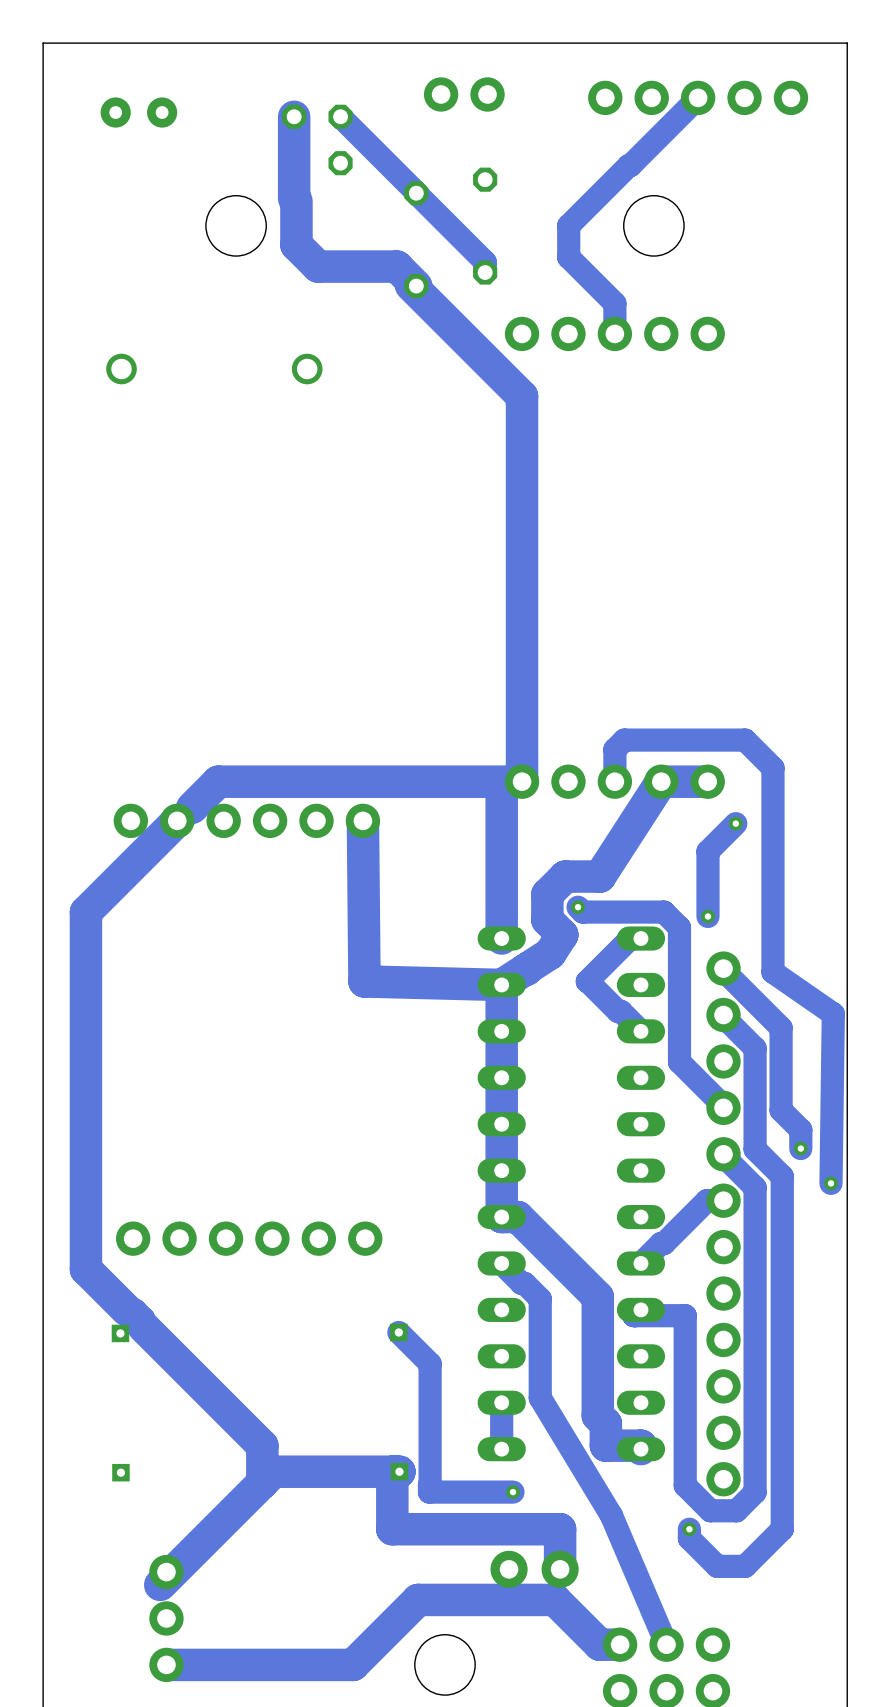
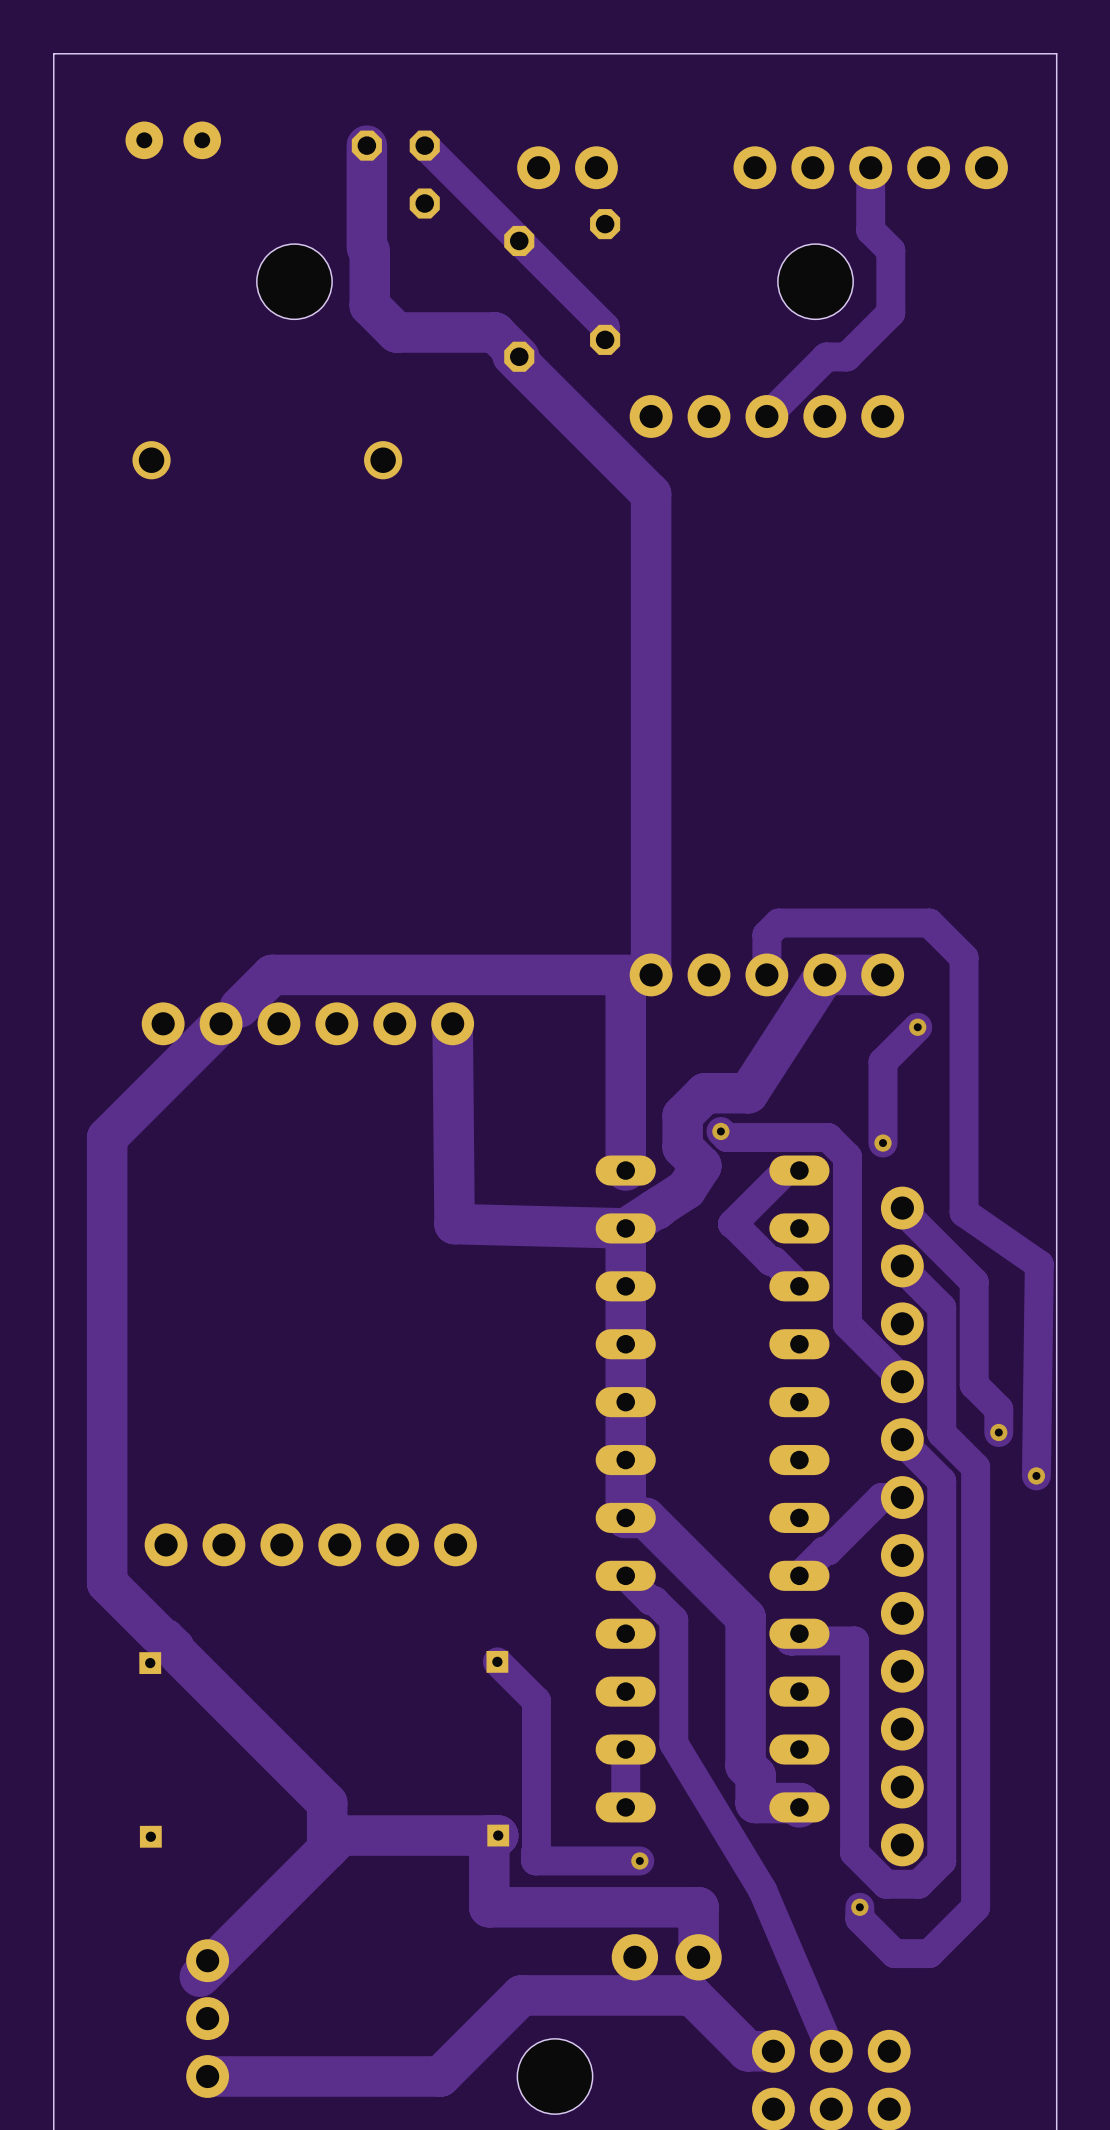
part position: (464, 94) -> (567, 167)
track: (698, 97) (568, 225) (568, 257) (614, 303) (614, 333) -> (870, 167) (870, 230) (890, 250) (890, 312) (846, 356) (826, 356) (766, 416)
part position: (698, 97) -> (870, 167)

